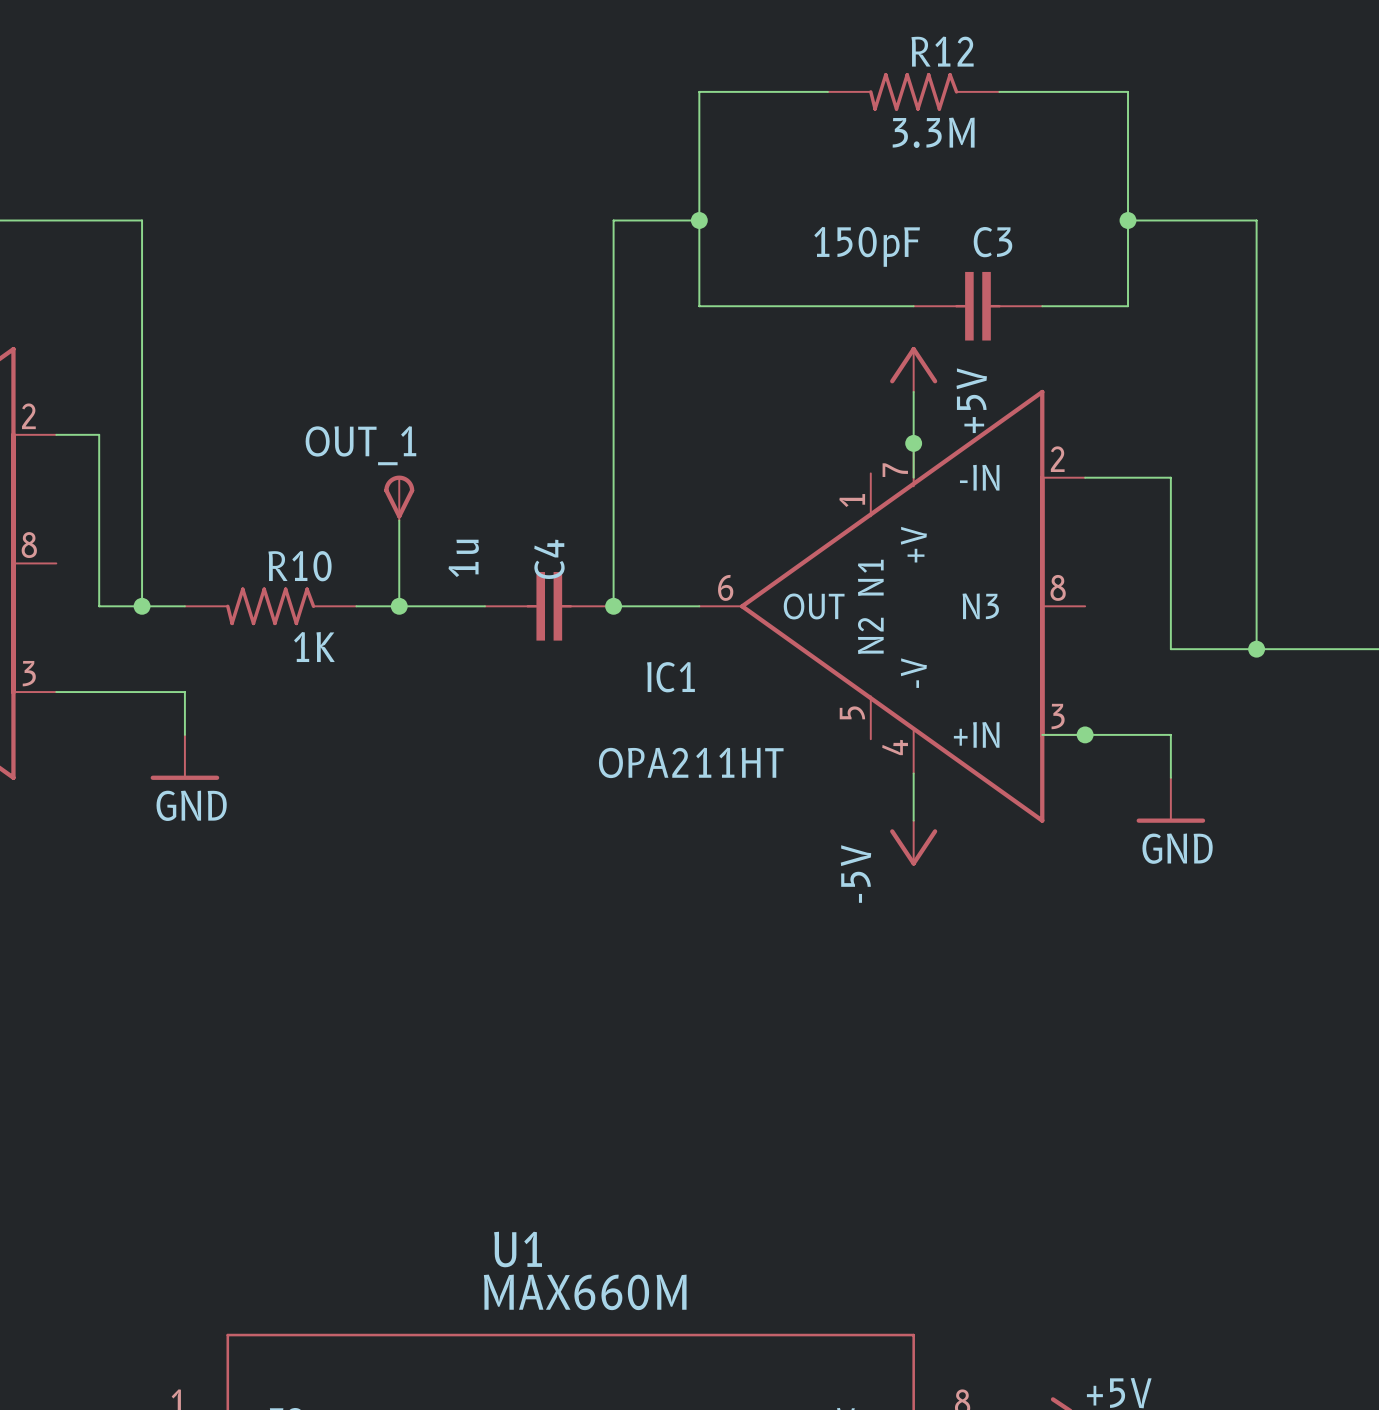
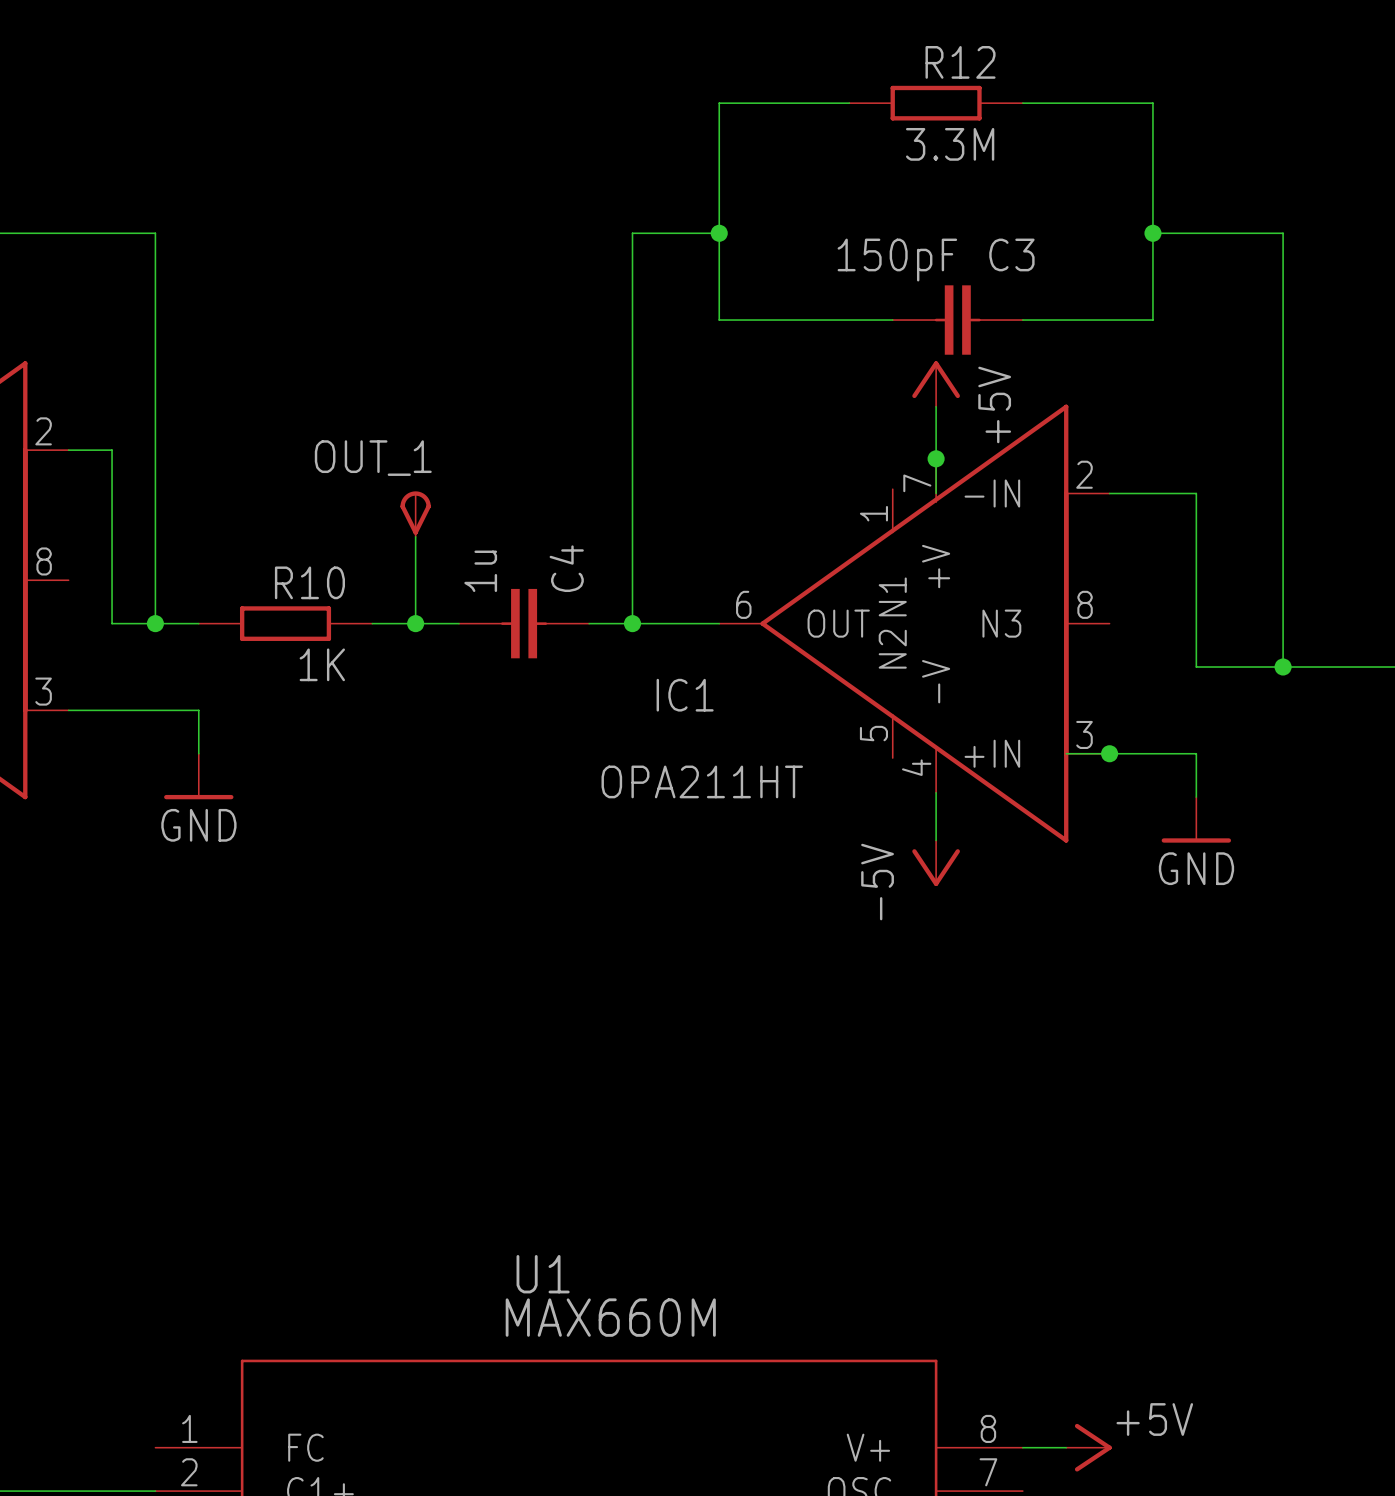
R12 symbol: [827, 73, 1000, 111] -> [849, 85, 1023, 121]
C3 position: (977, 306) -> (957, 320)
R10 symbol: [184, 587, 357, 626] -> [198, 606, 373, 641]
C4 position: (549, 606) -> (524, 623)

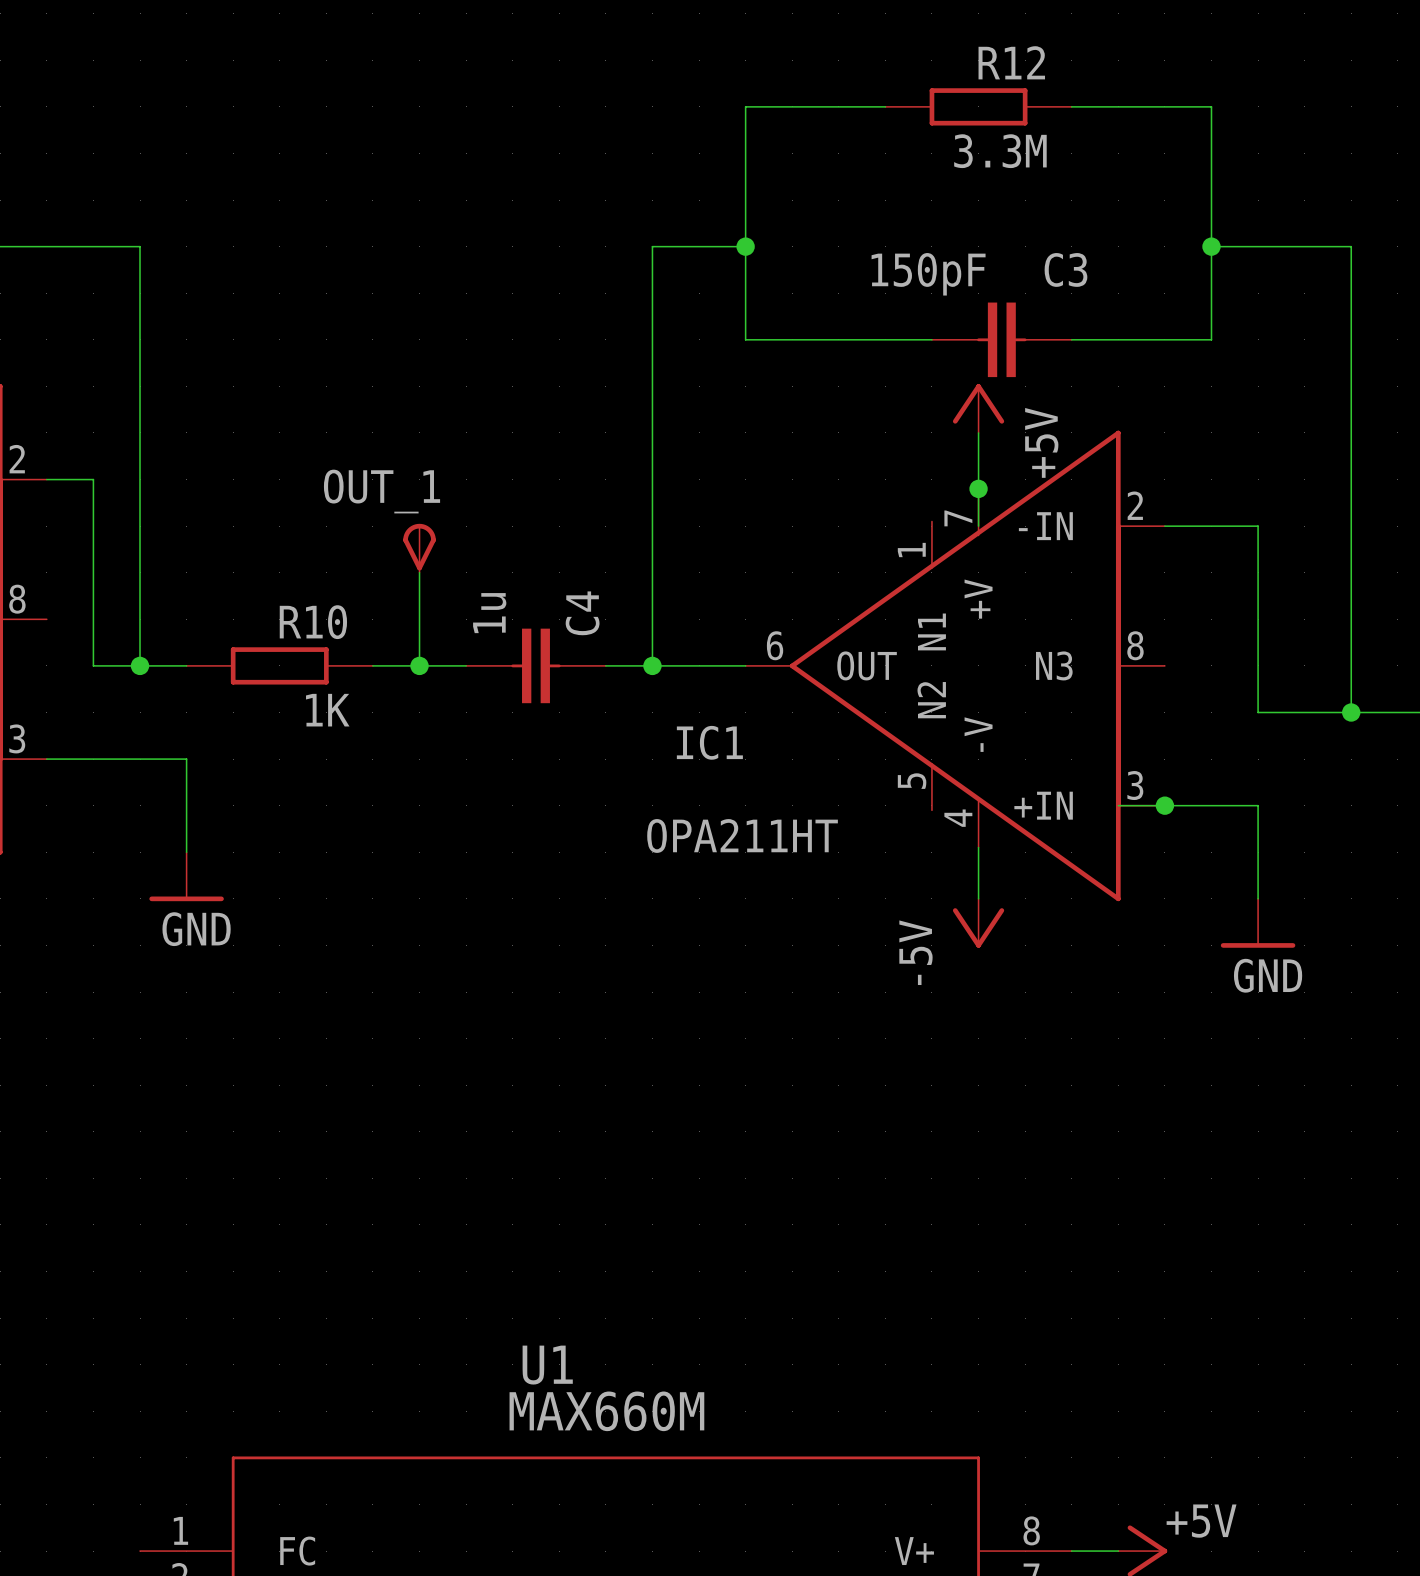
power symbol position: GND (198, 776) -> GND (186, 876)
power symbol position: GND (1196, 819) -> GND (1258, 923)

